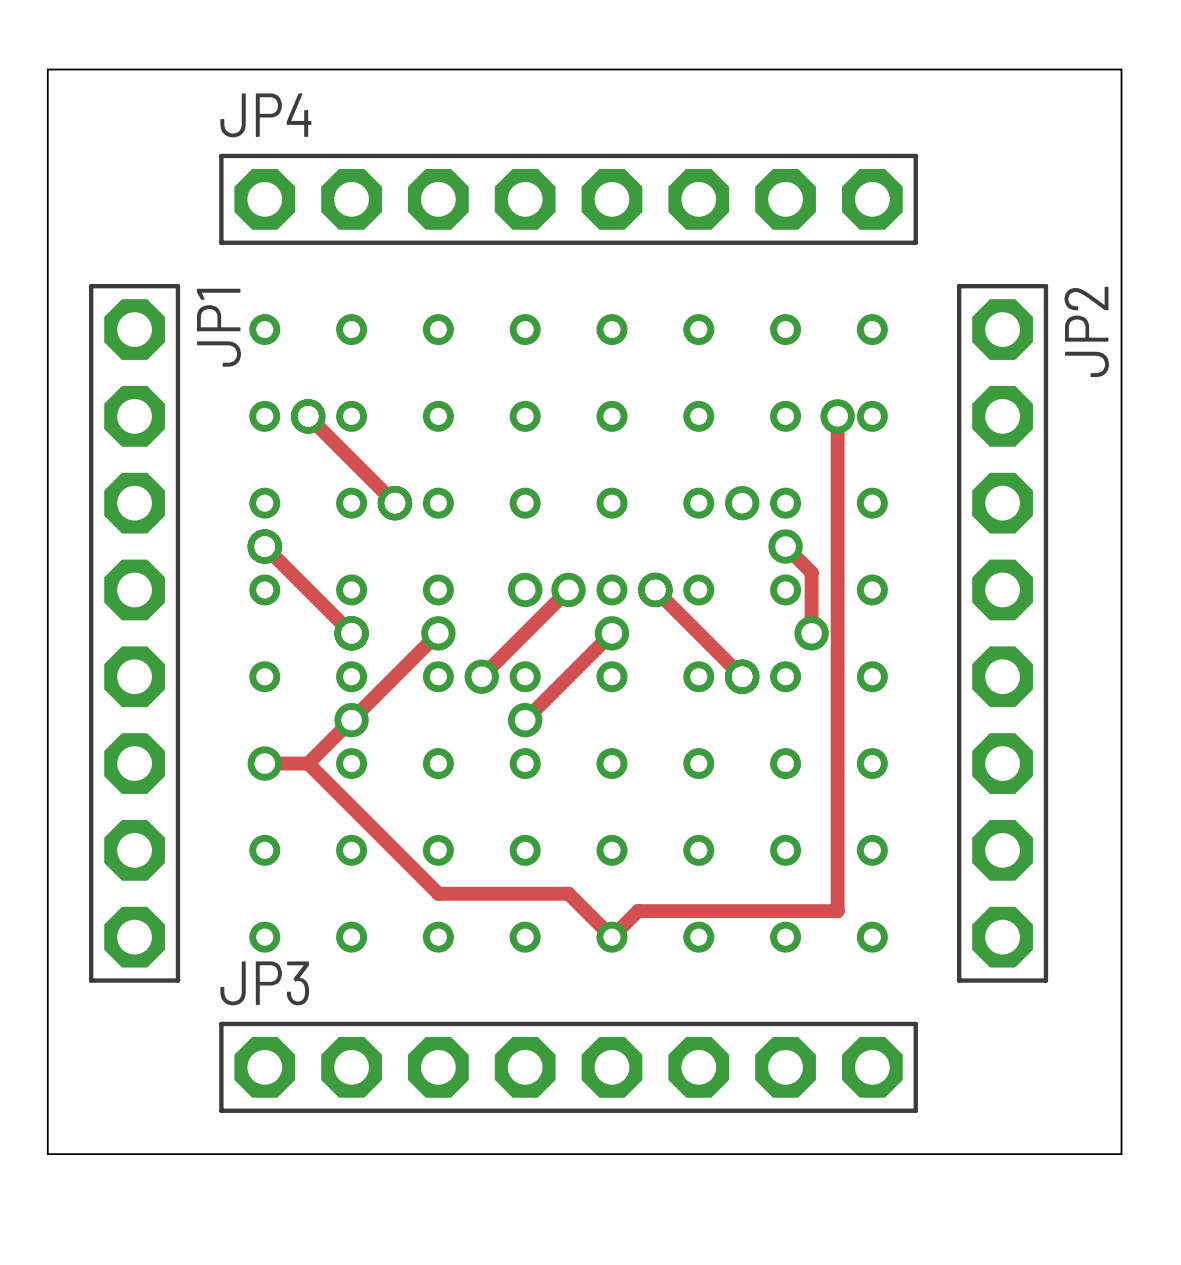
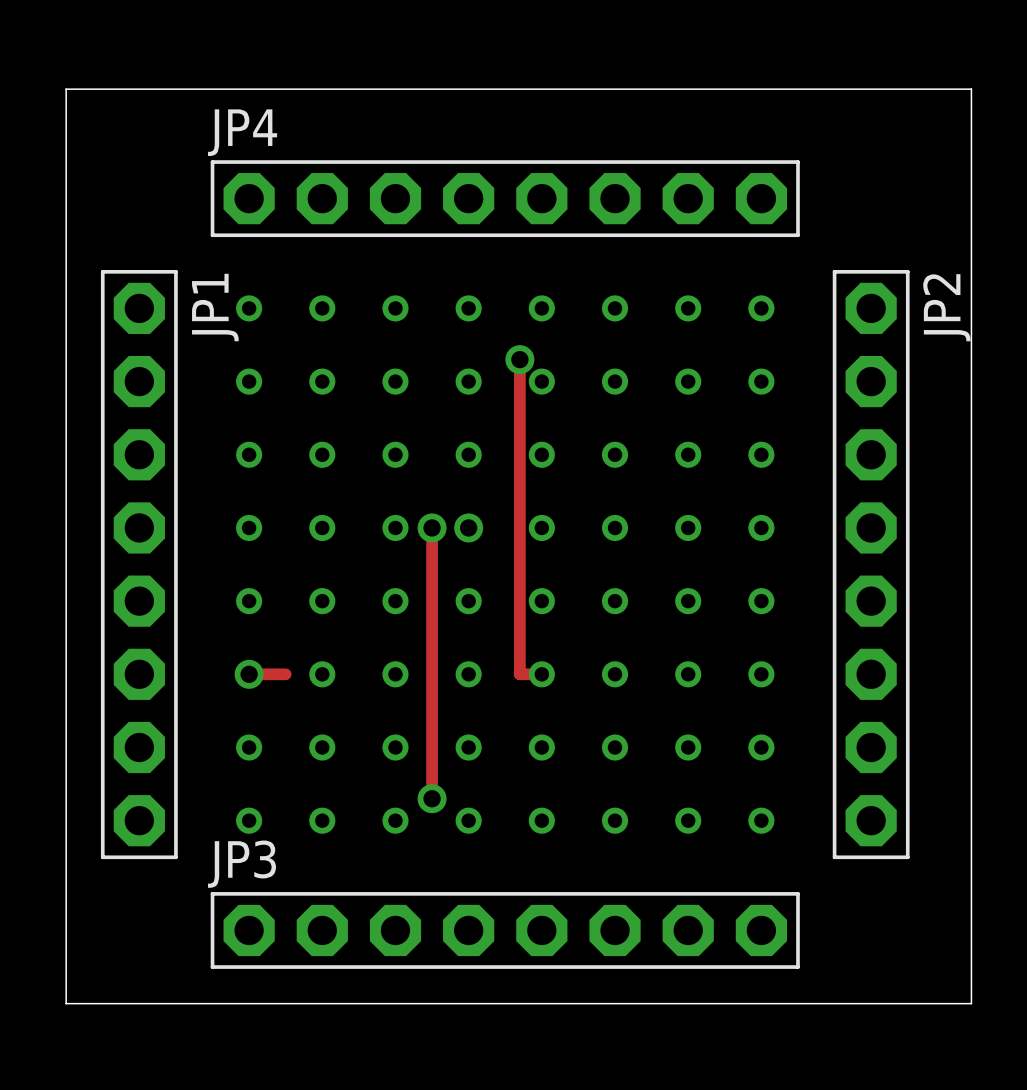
track: none -> (519, 359) (519, 674) (541, 674)
via: none -> (519, 359)
track: (308, 416) (394, 503) -> none
via: (308, 416) -> none
track: (837, 416) (837, 911) (638, 911) (611, 937) (568, 893) (438, 893) (308, 763) (438, 633) -> none
via: (837, 416) -> none
via: (394, 503) -> none
via: (742, 503) -> none
track: (264, 546) (351, 633) -> none
via: (264, 546) -> none
track: (785, 546) (811, 572) (811, 633) -> none
via: (785, 546) -> none
track: none -> (432, 527) (432, 798)
via: none -> (432, 527)
track: (568, 589) (481, 676) -> none
via: (568, 589) -> none
track: (655, 589) (742, 676) -> none
via: (655, 589) -> none
via: (351, 633) -> none
via: (438, 633) -> none
track: (611, 633) (525, 720) -> none
via: (611, 633) -> none
via: (811, 633) -> none
via: (481, 676) -> none
via: (742, 676) -> none
via: (351, 720) -> none
via: (525, 720) -> none
via: none -> (432, 798)

